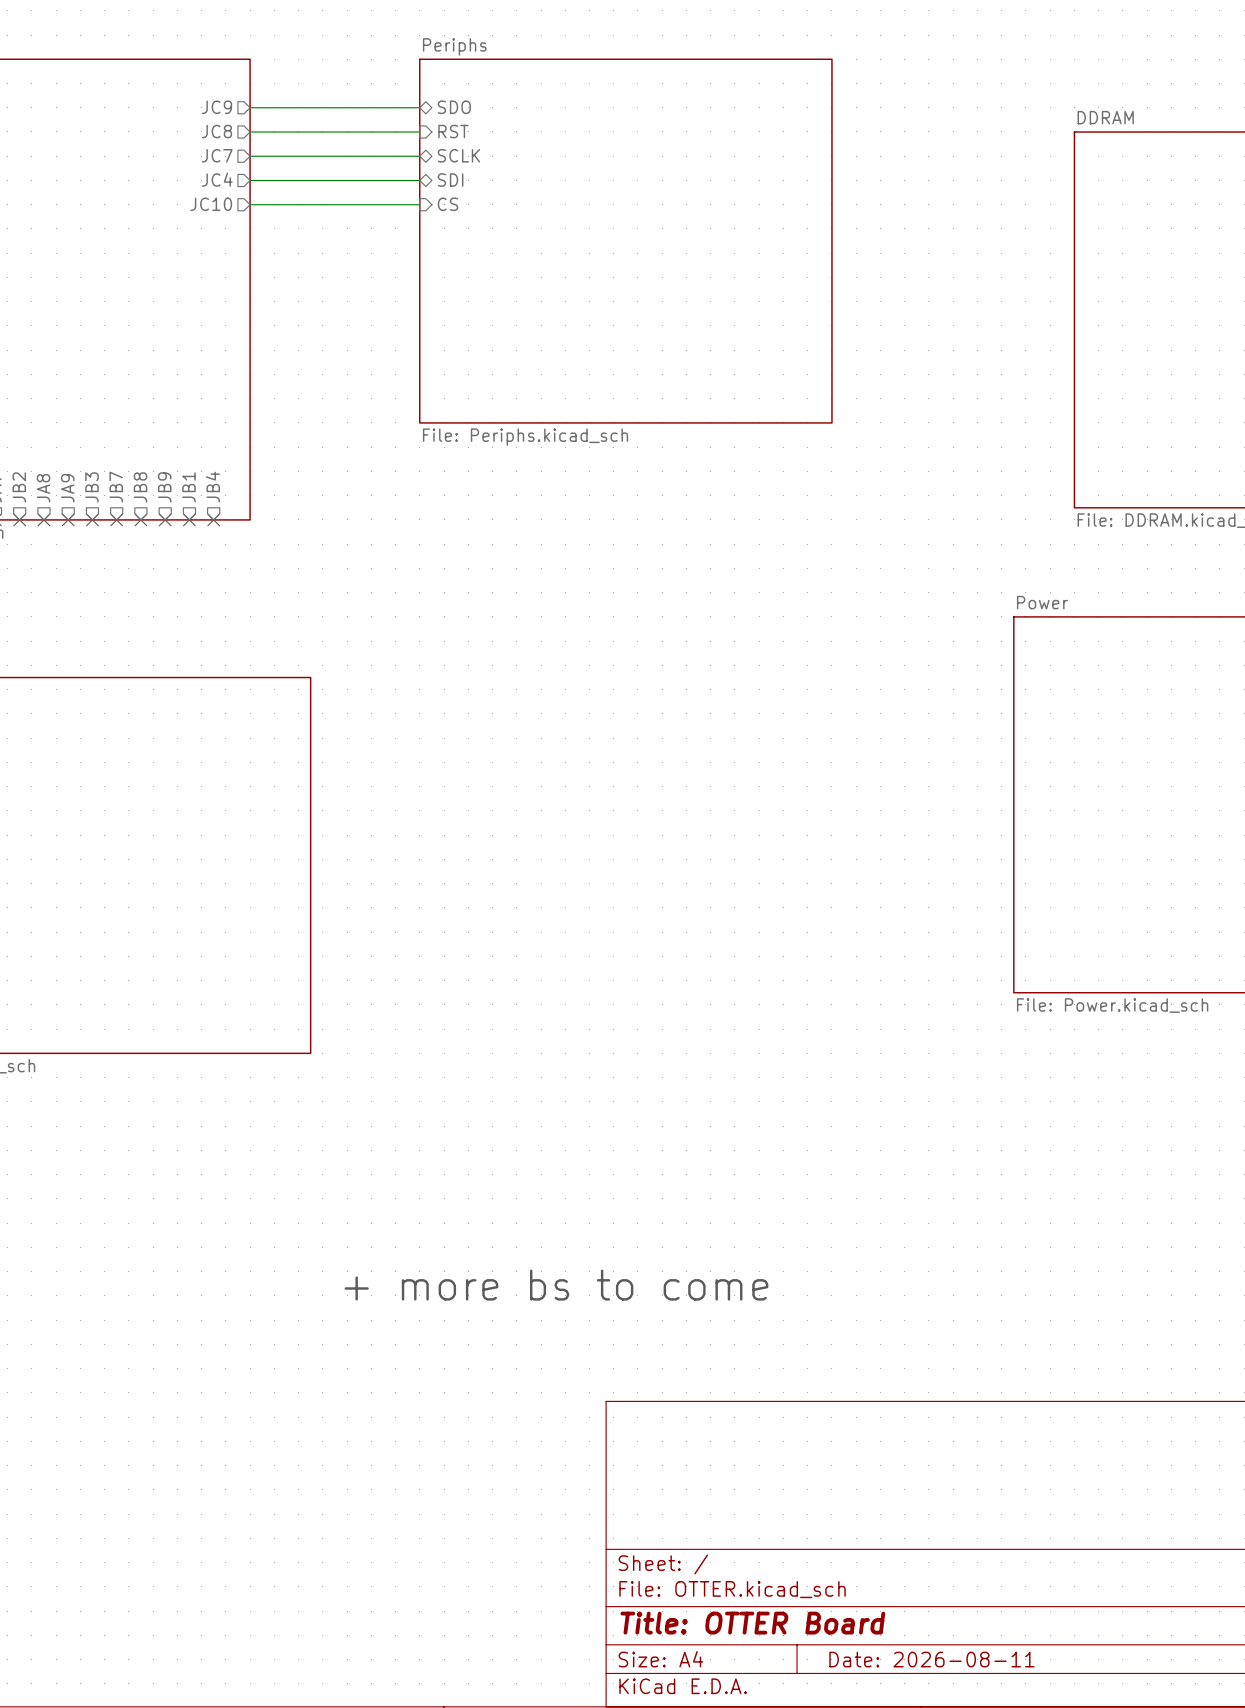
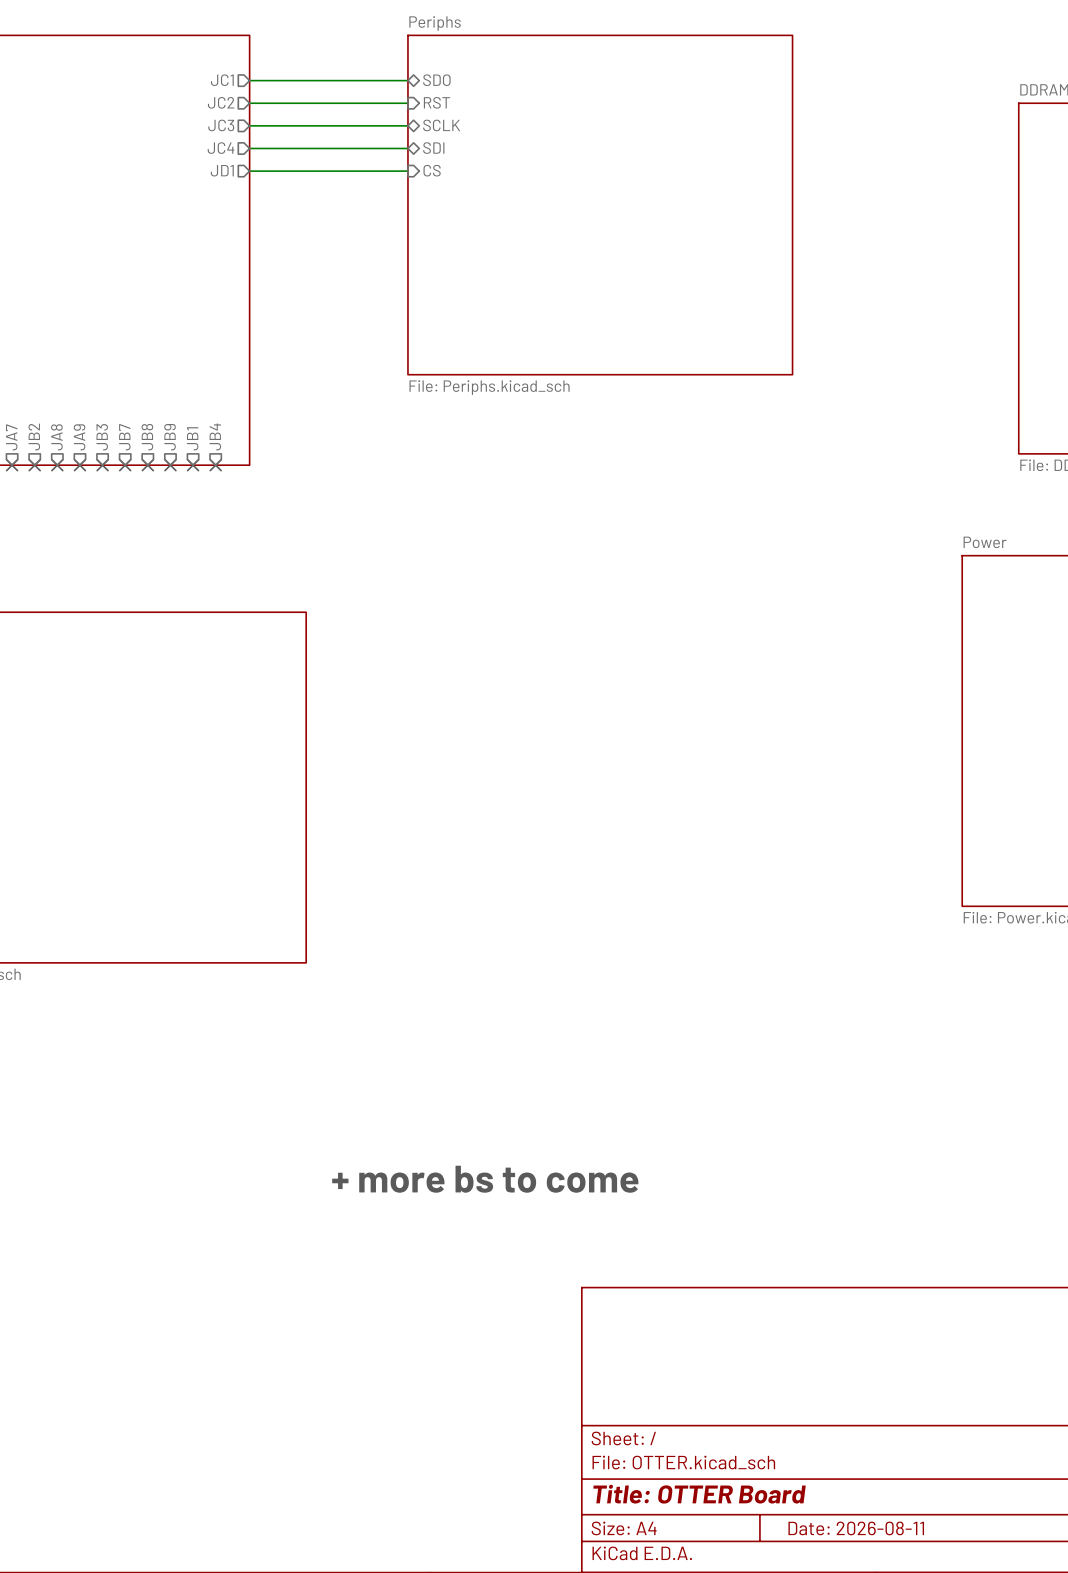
sheet pin: JC9 (216, 107) -> JC1 (222, 80)
sheet pin: JC8 (216, 131) -> JC2 (221, 102)
sheet pin: JC7 (217, 155) -> JC3 (221, 125)
sheet pin: JC10 (211, 204) -> JD1 (222, 170)

